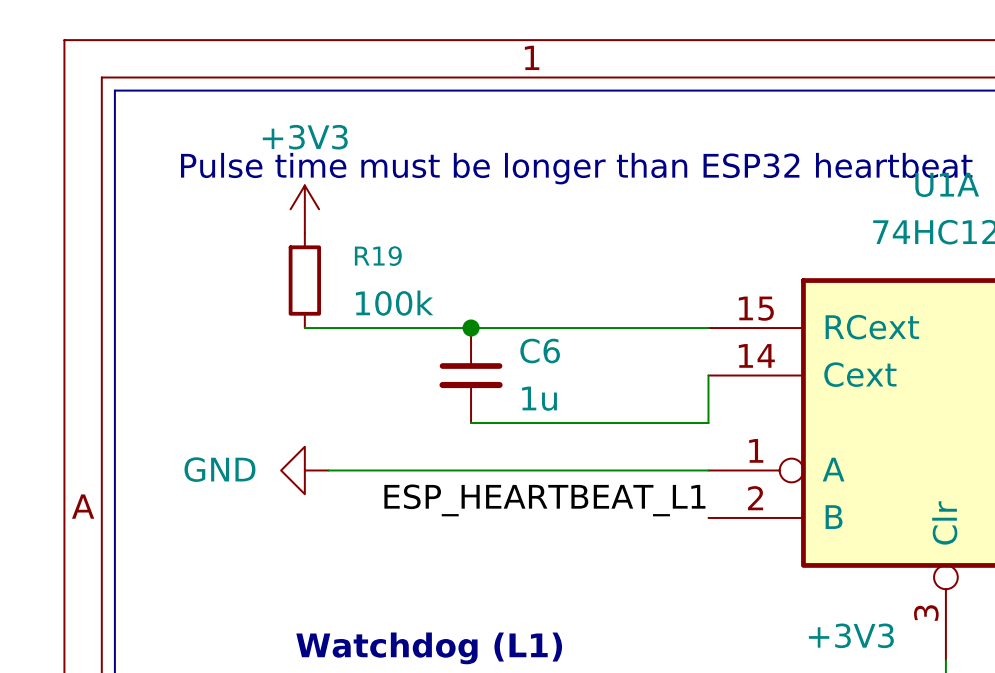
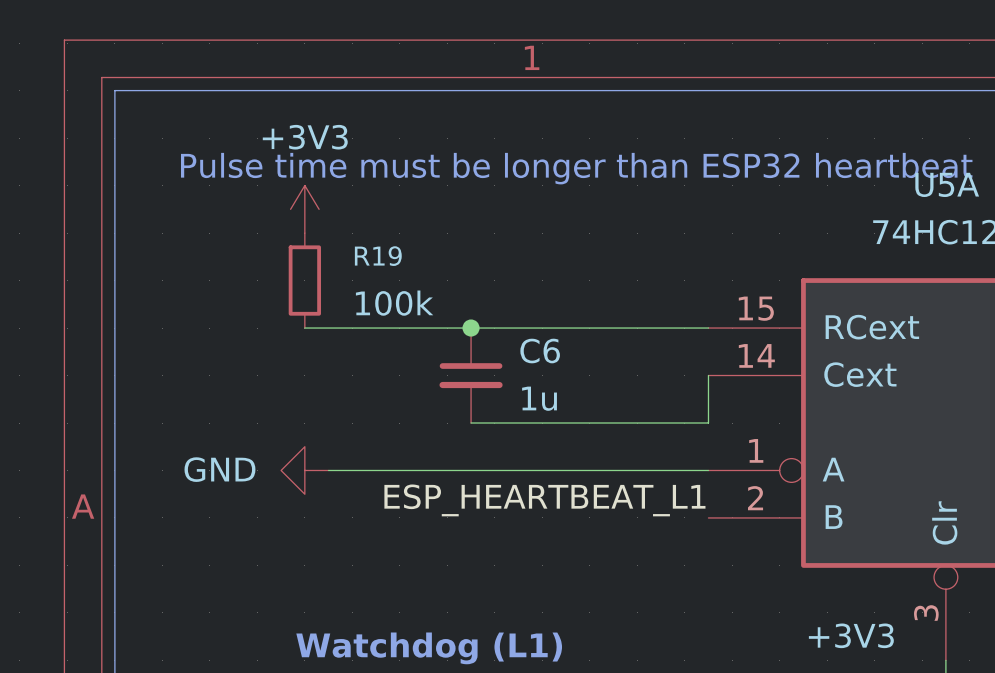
U1A name: U1A (947, 184) -> U5A (947, 184)

